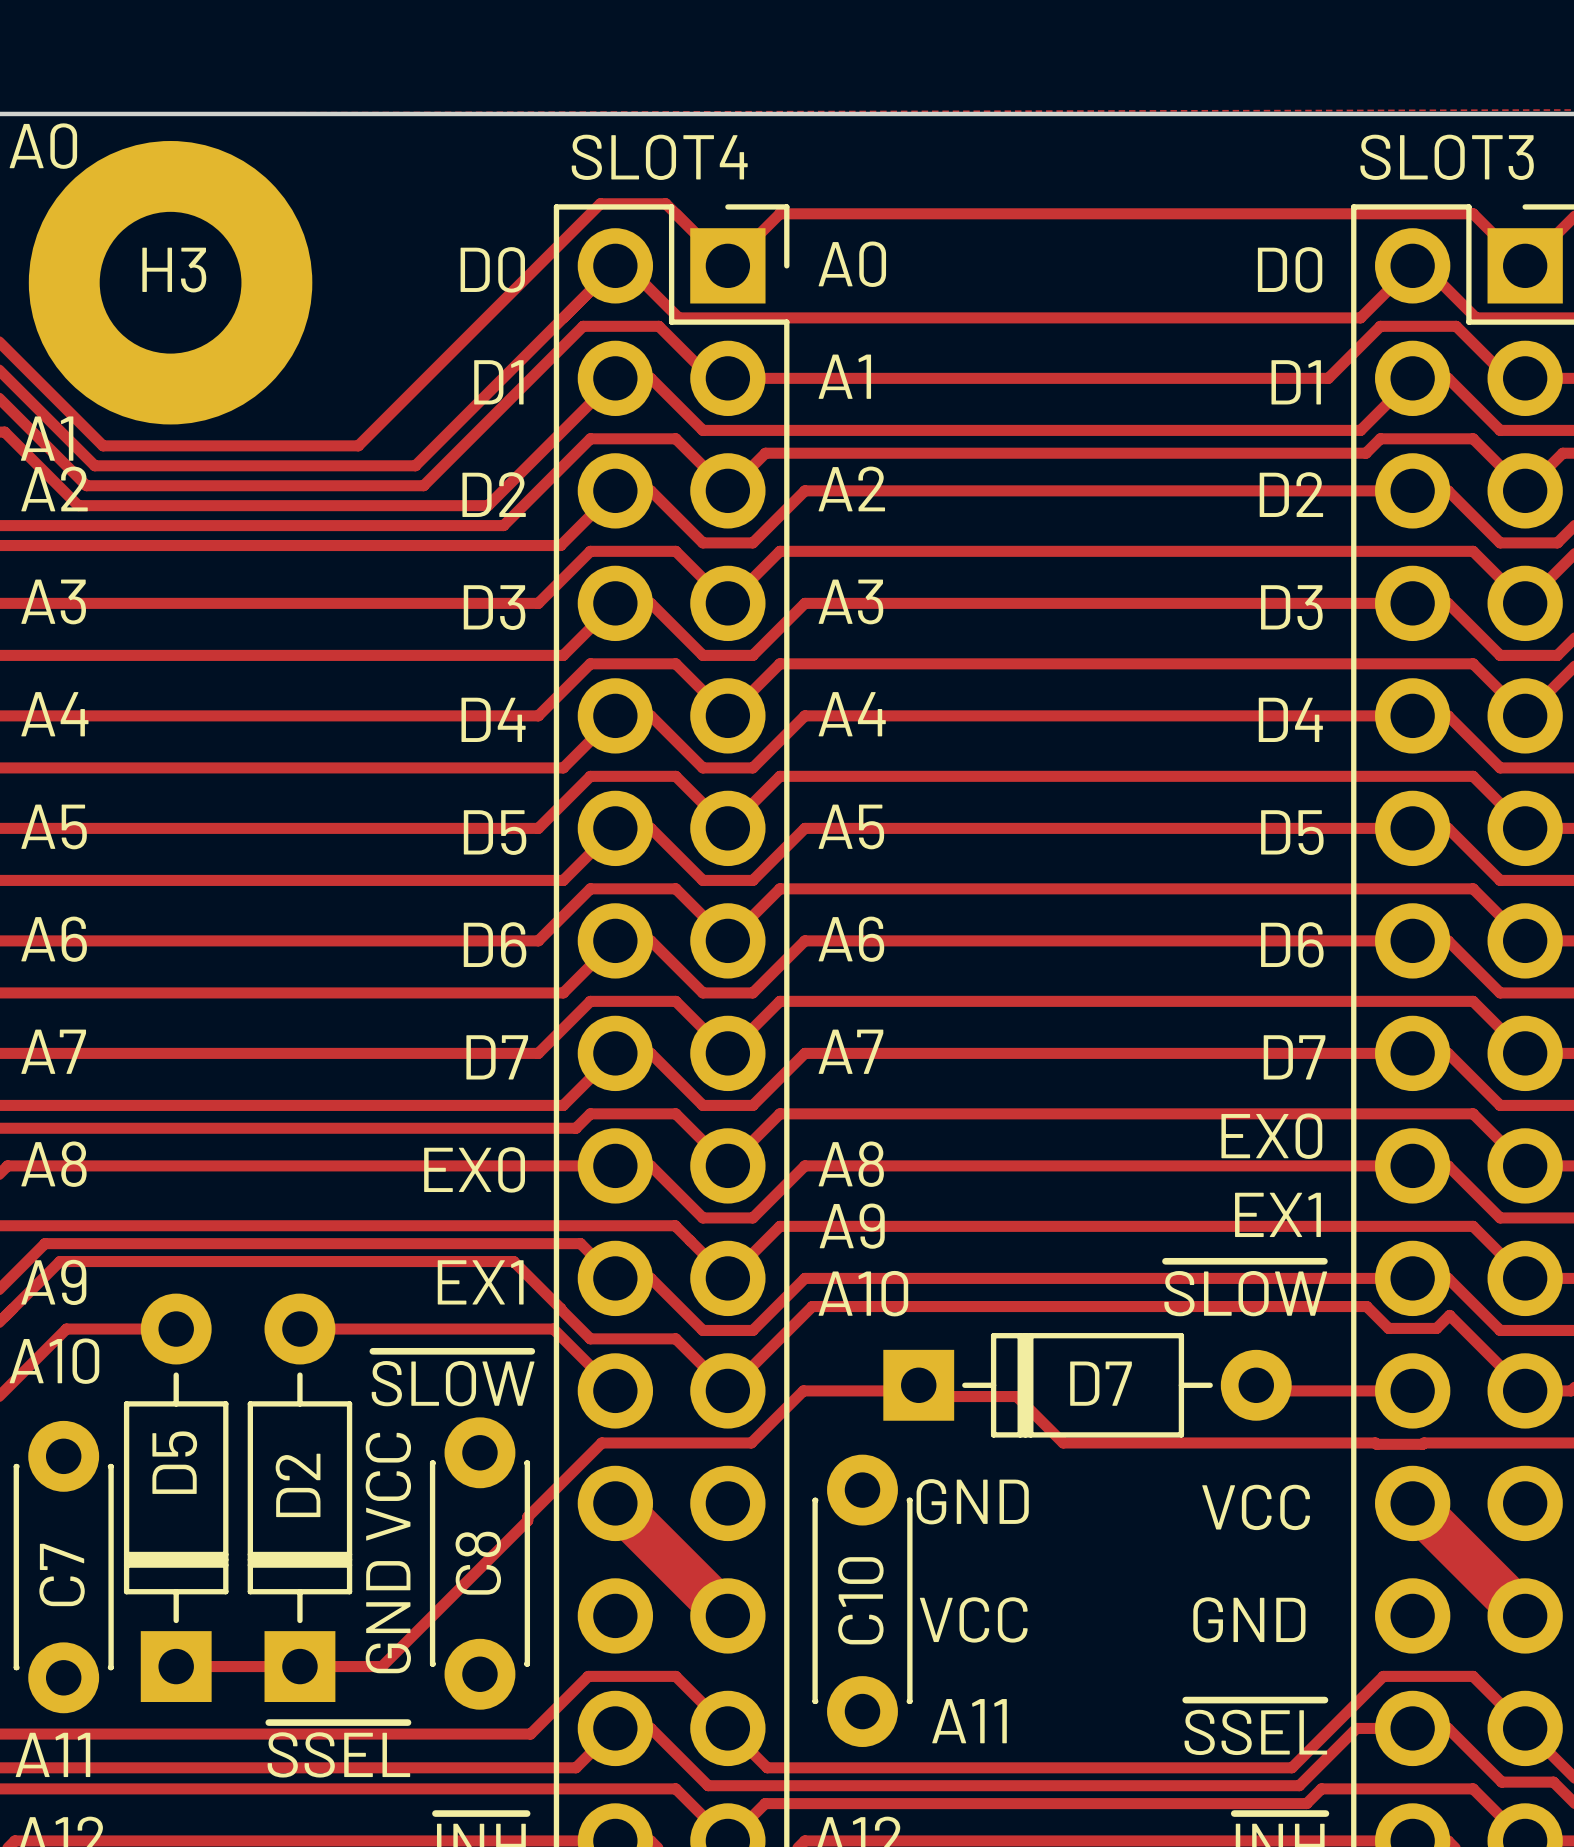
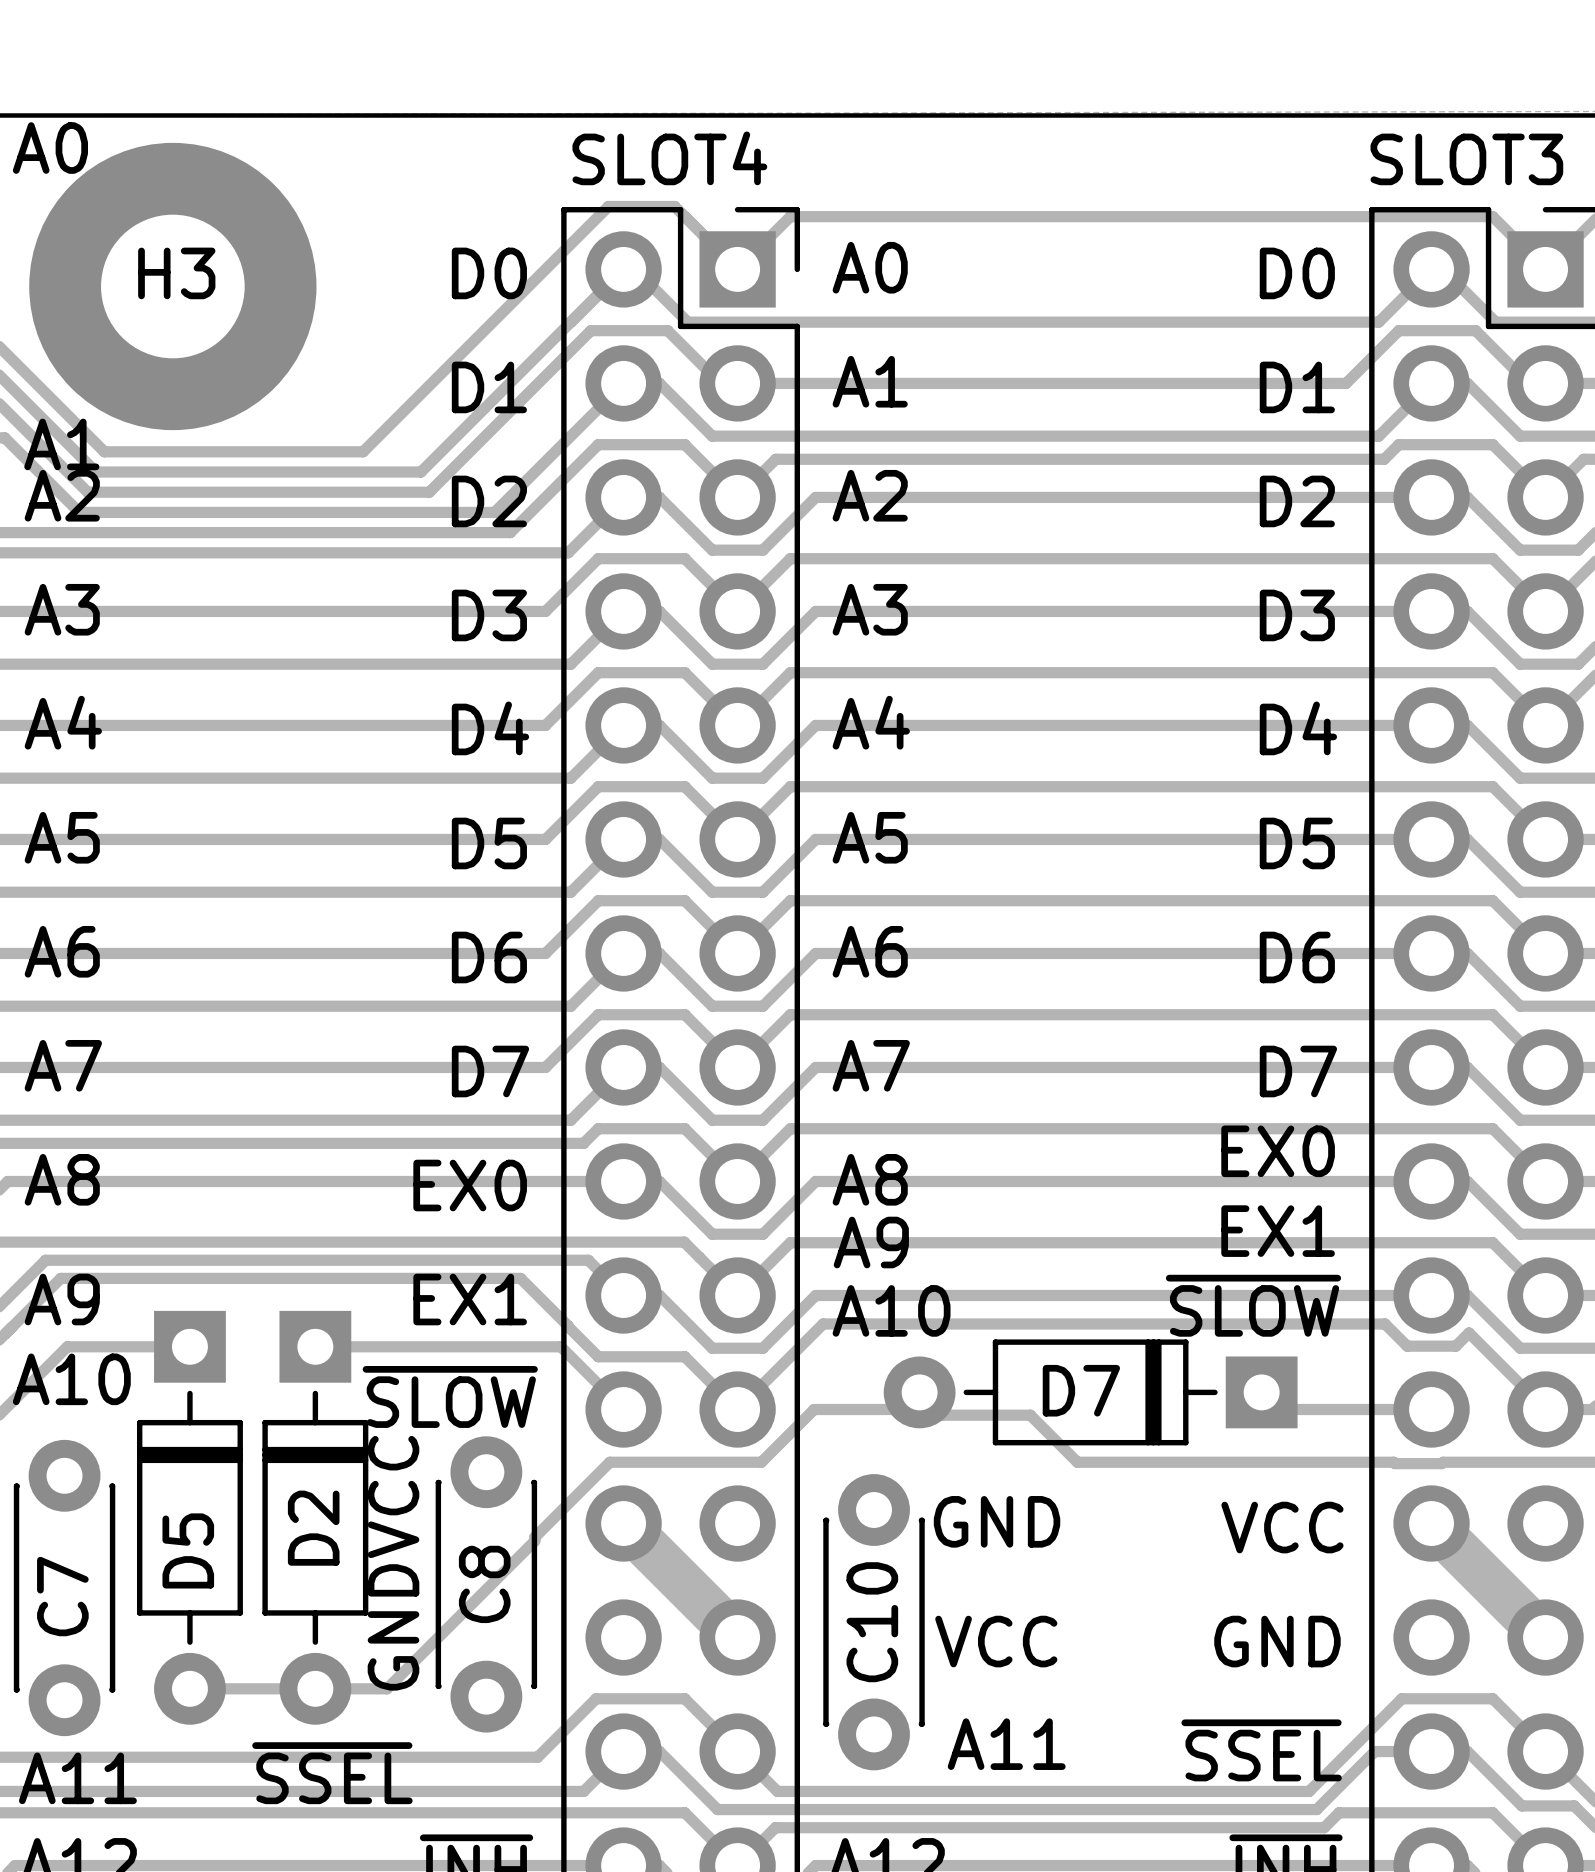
D7 rotation: 0° (1087, 1385) -> 180° (1090, 1392)
D5 rotation: 0° (176, 1497) -> 180° (189, 1517)
D2 rotation: 0° (299, 1497) -> 180° (315, 1517)

